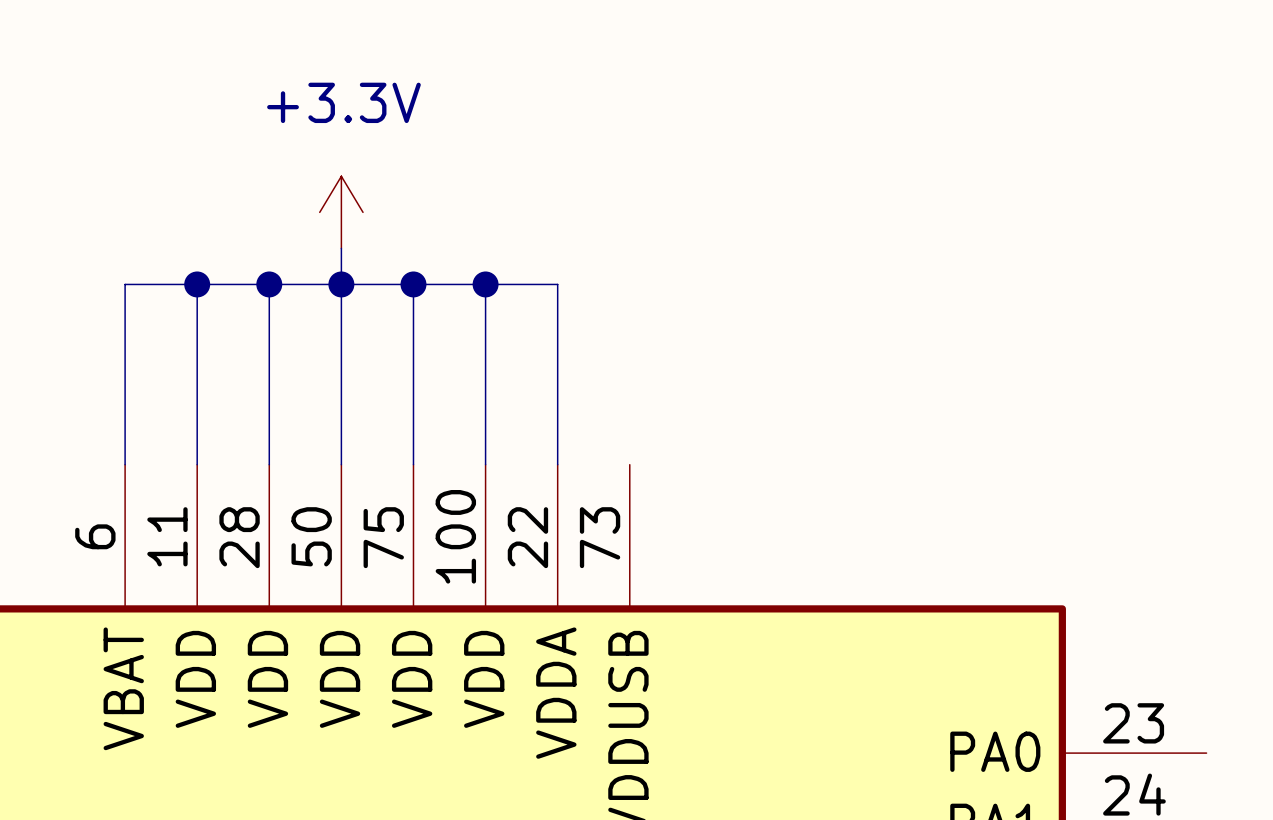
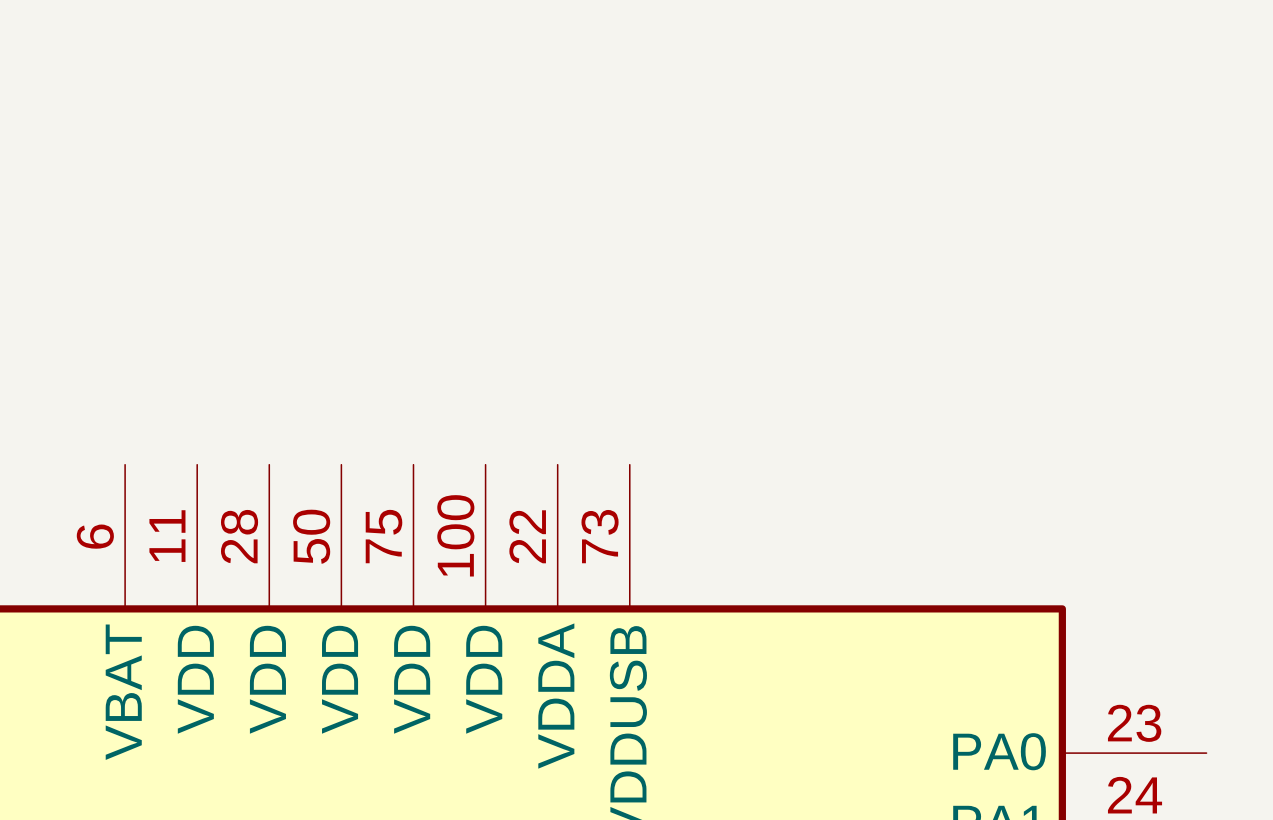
power symbol: +3.3V (341, 212) -> none
wire: (341, 248) (341, 464) -> none
wire: (197, 284) (197, 464) -> none
junction: (197, 284) -> none
wire: (269, 284) (269, 464) -> none
junction: (269, 284) -> none
junction: (341, 284) -> none
wire: (413, 284) (413, 464) -> none
junction: (413, 284) -> none
wire: (485, 284) (485, 464) -> none
junction: (485, 284) -> none
wire: (125, 464) (125, 284) (557, 284) (557, 464) -> none

